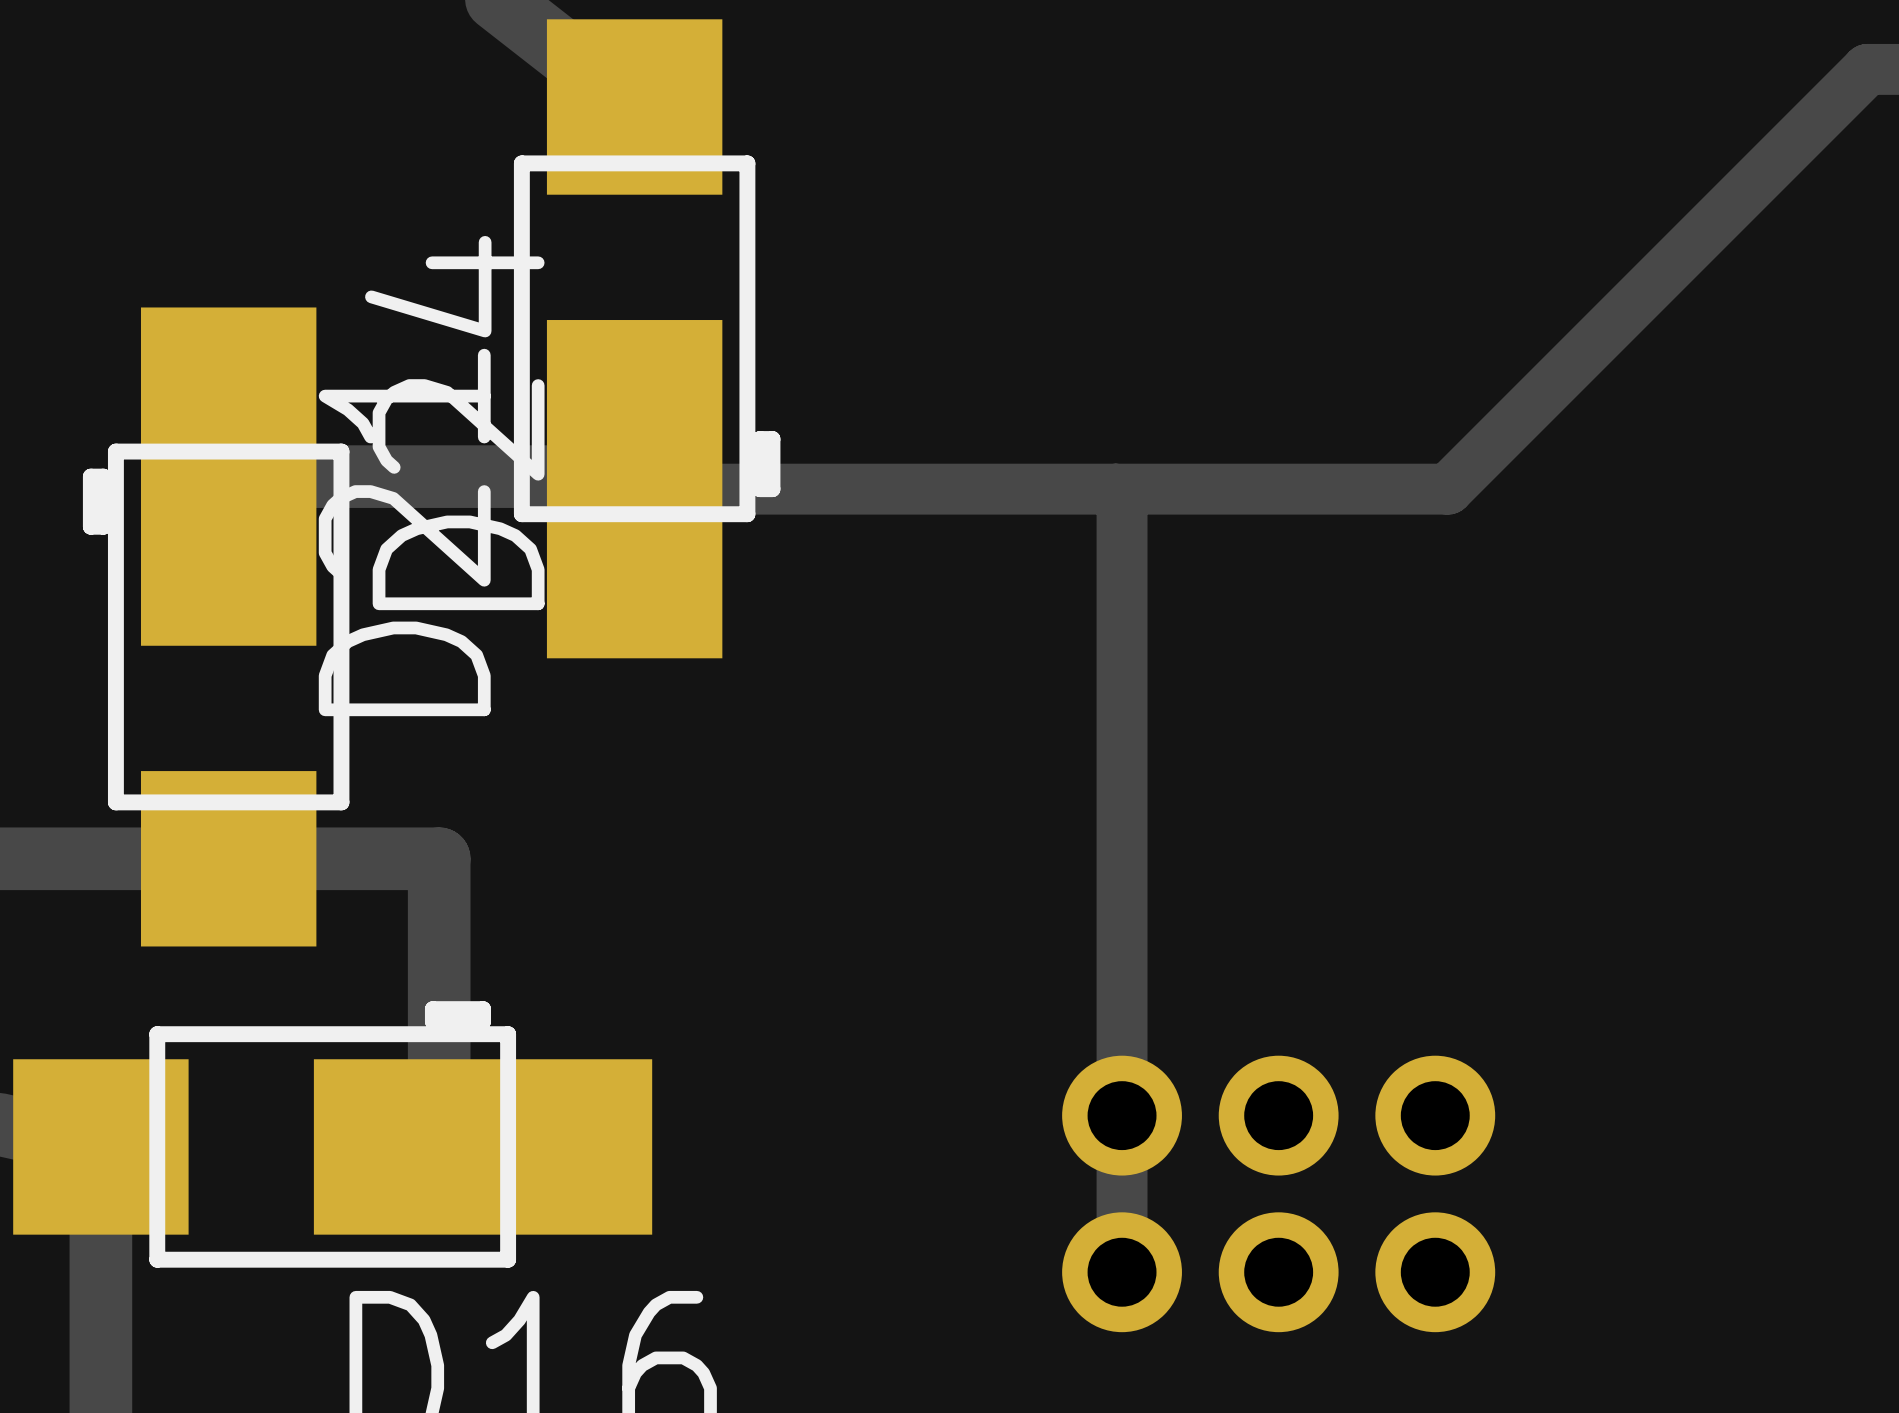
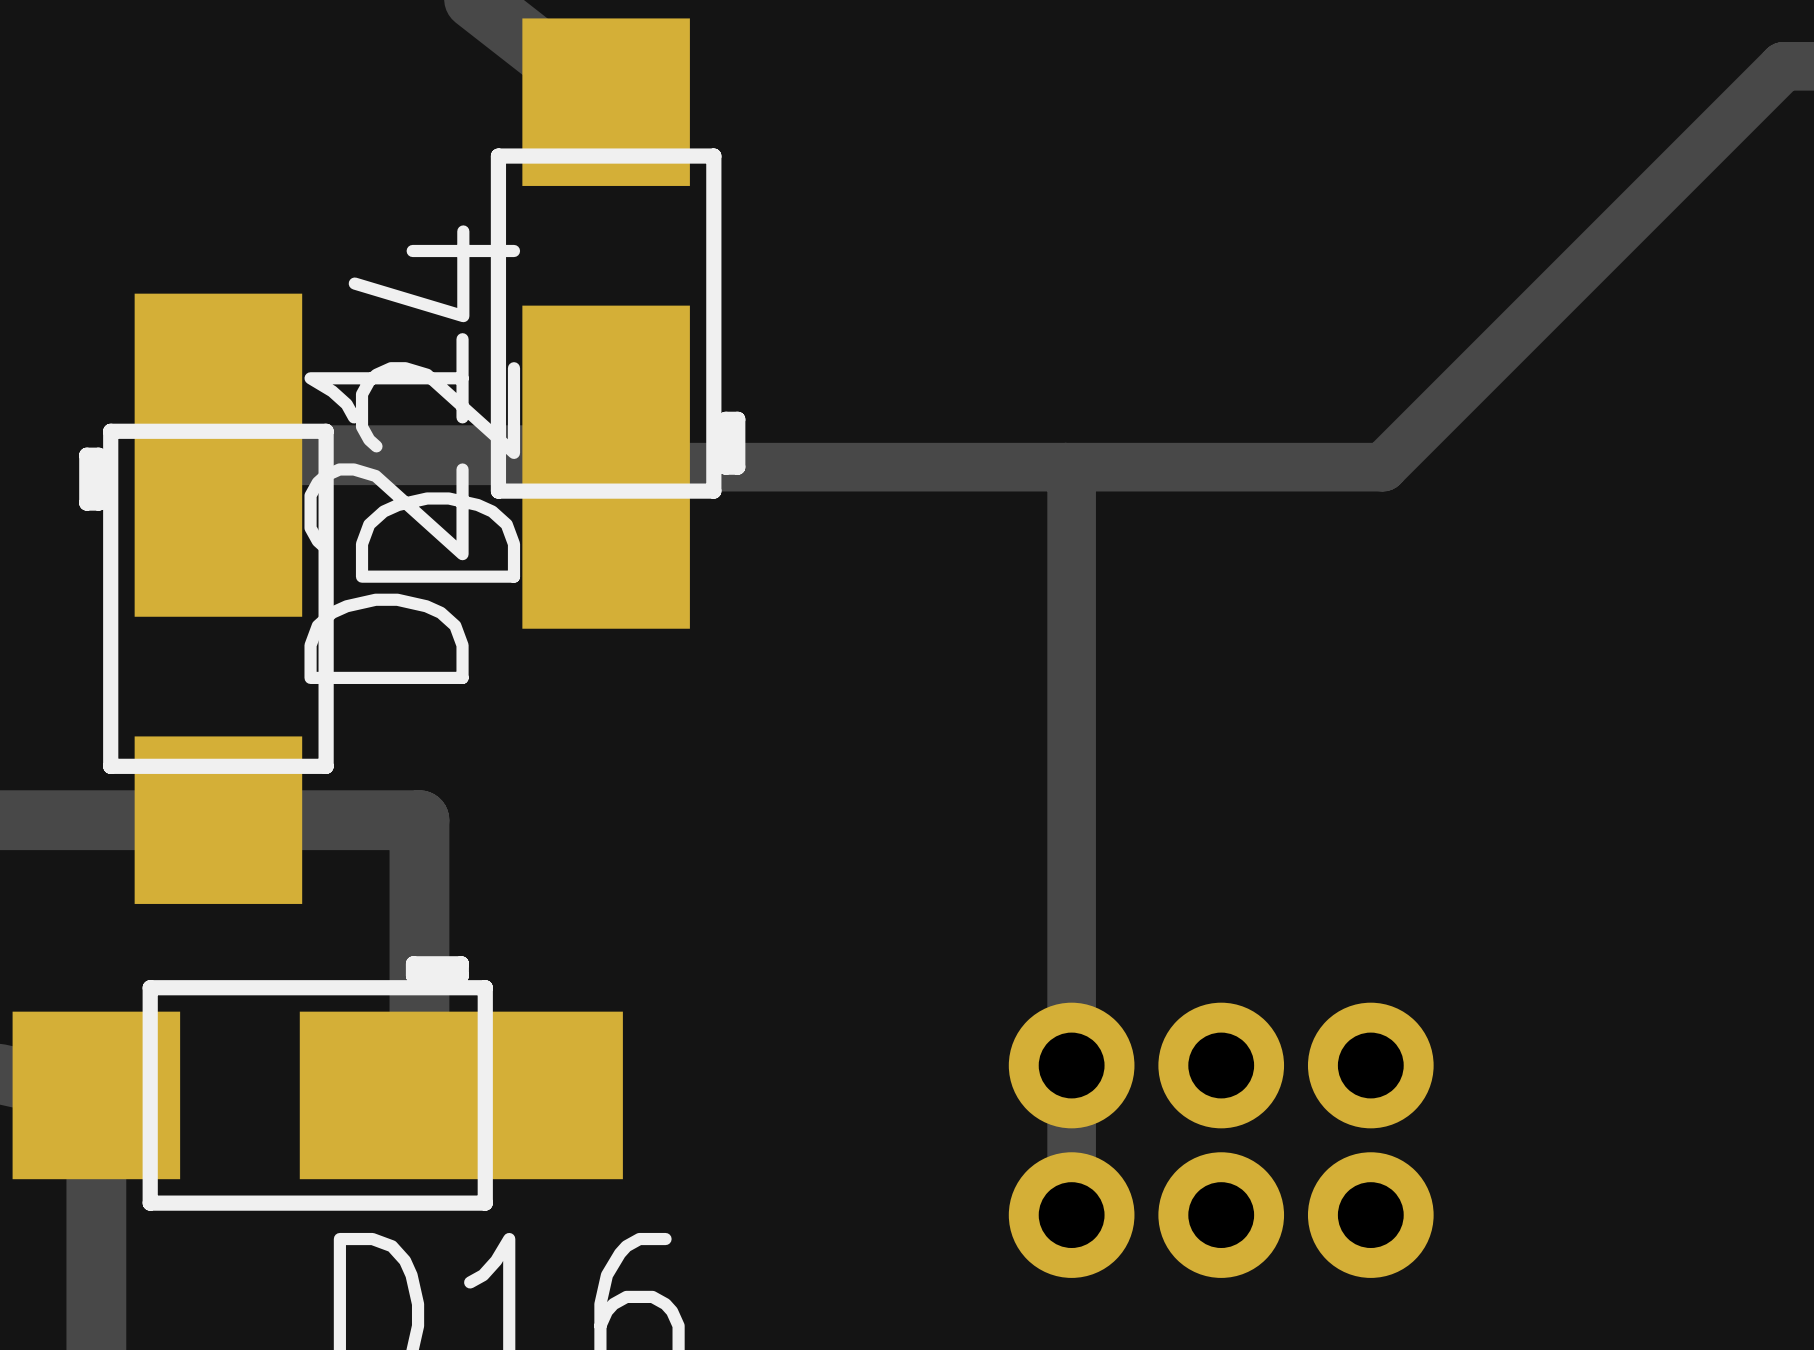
part footprint: [1062, 1055, 1496, 1333] -> [1008, 1002, 1434, 1278]

